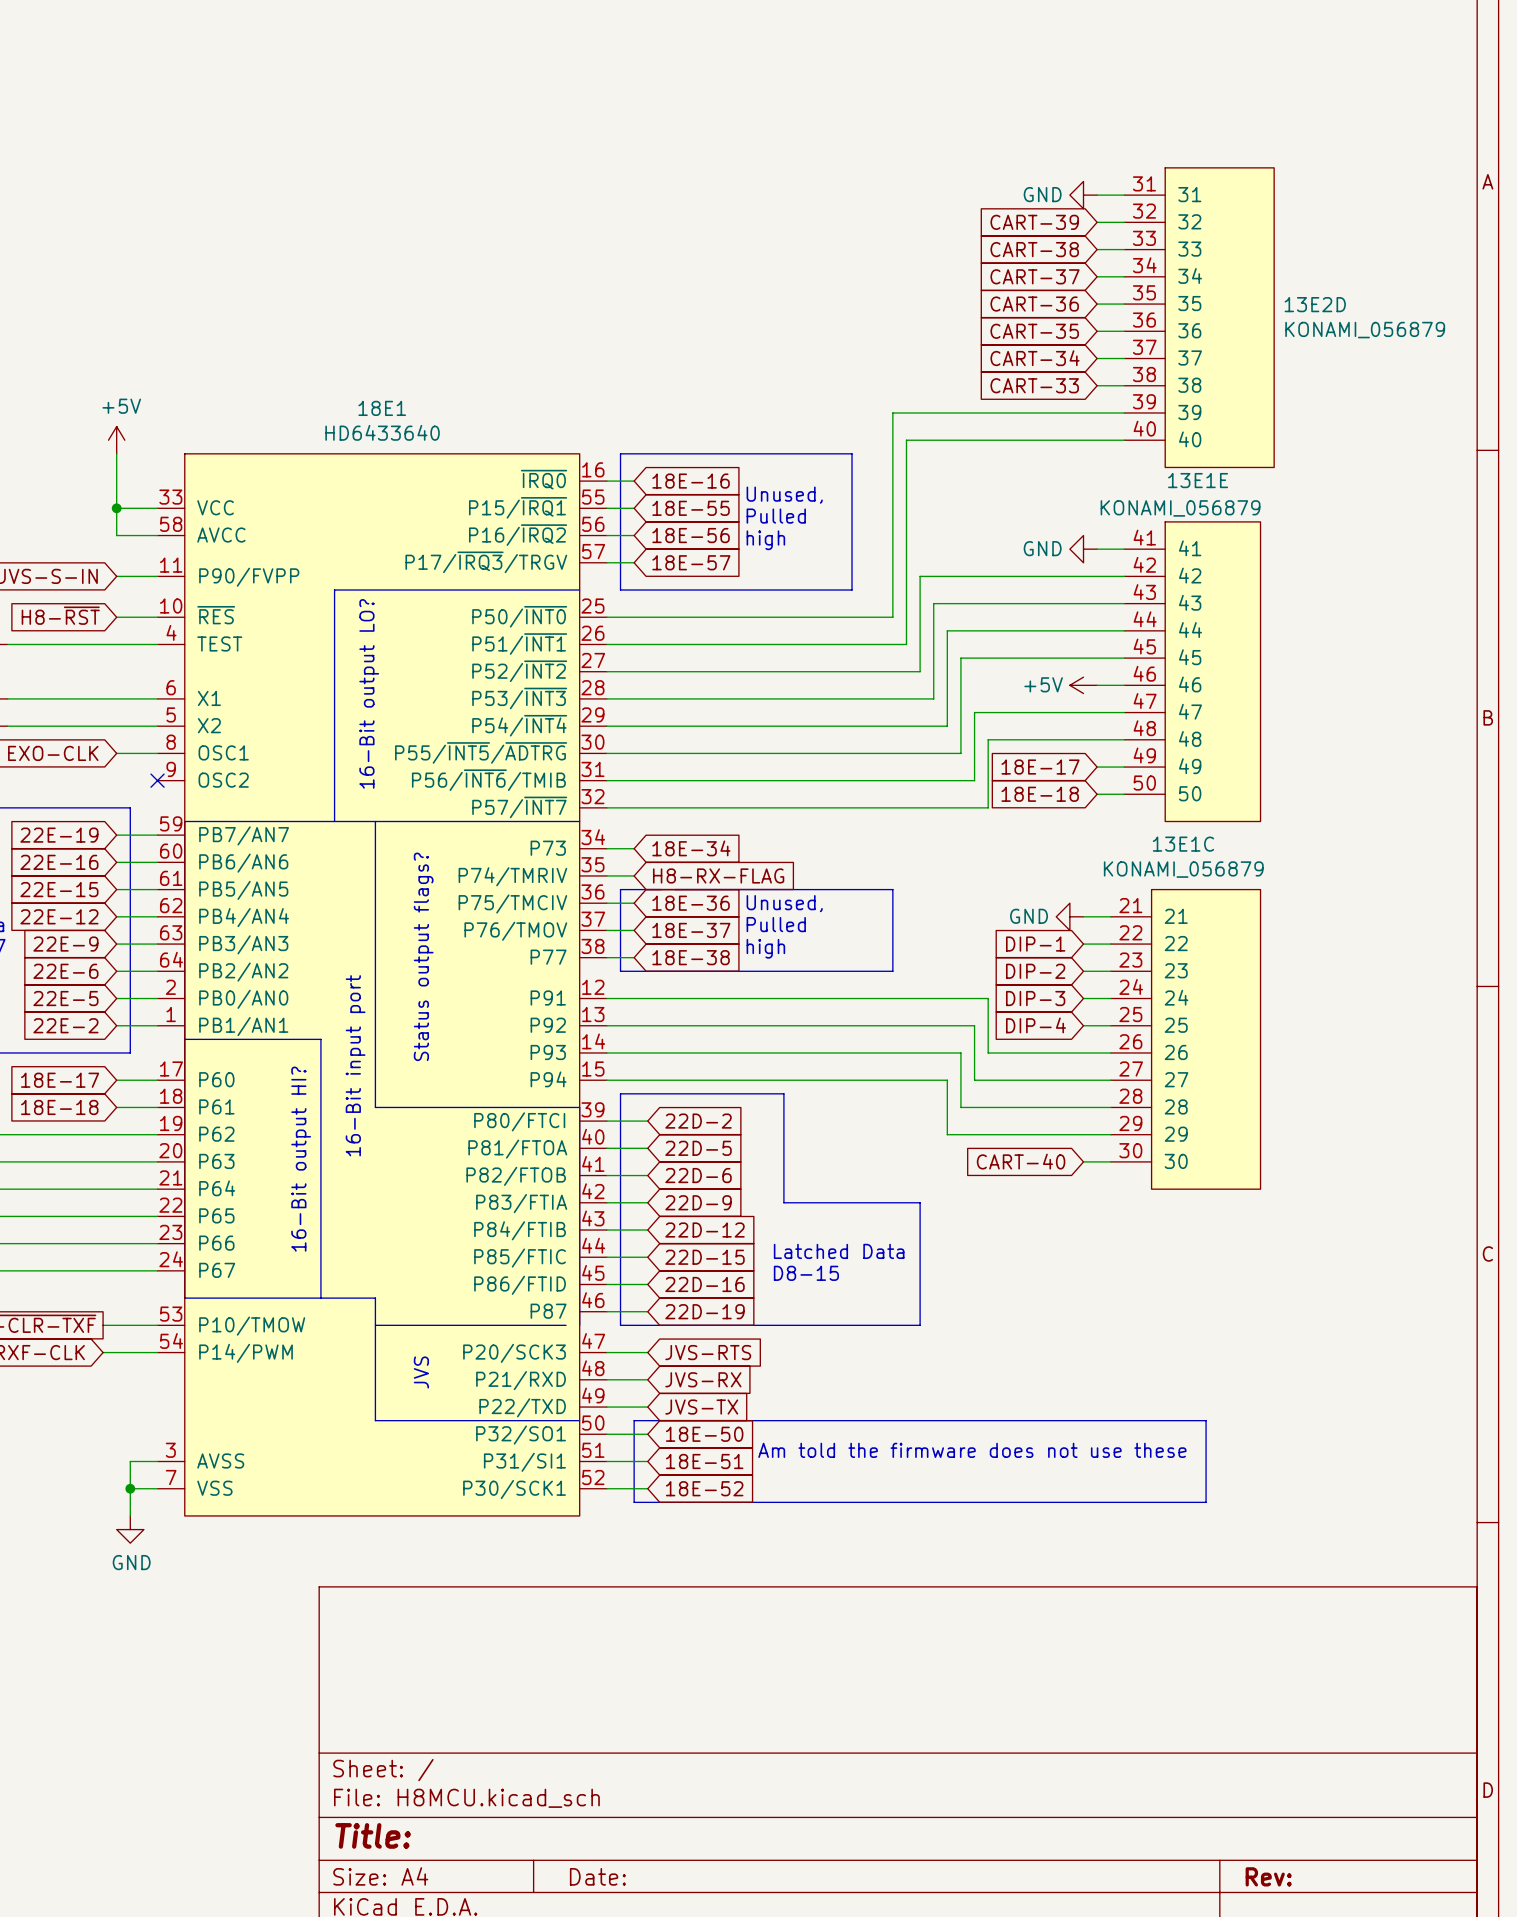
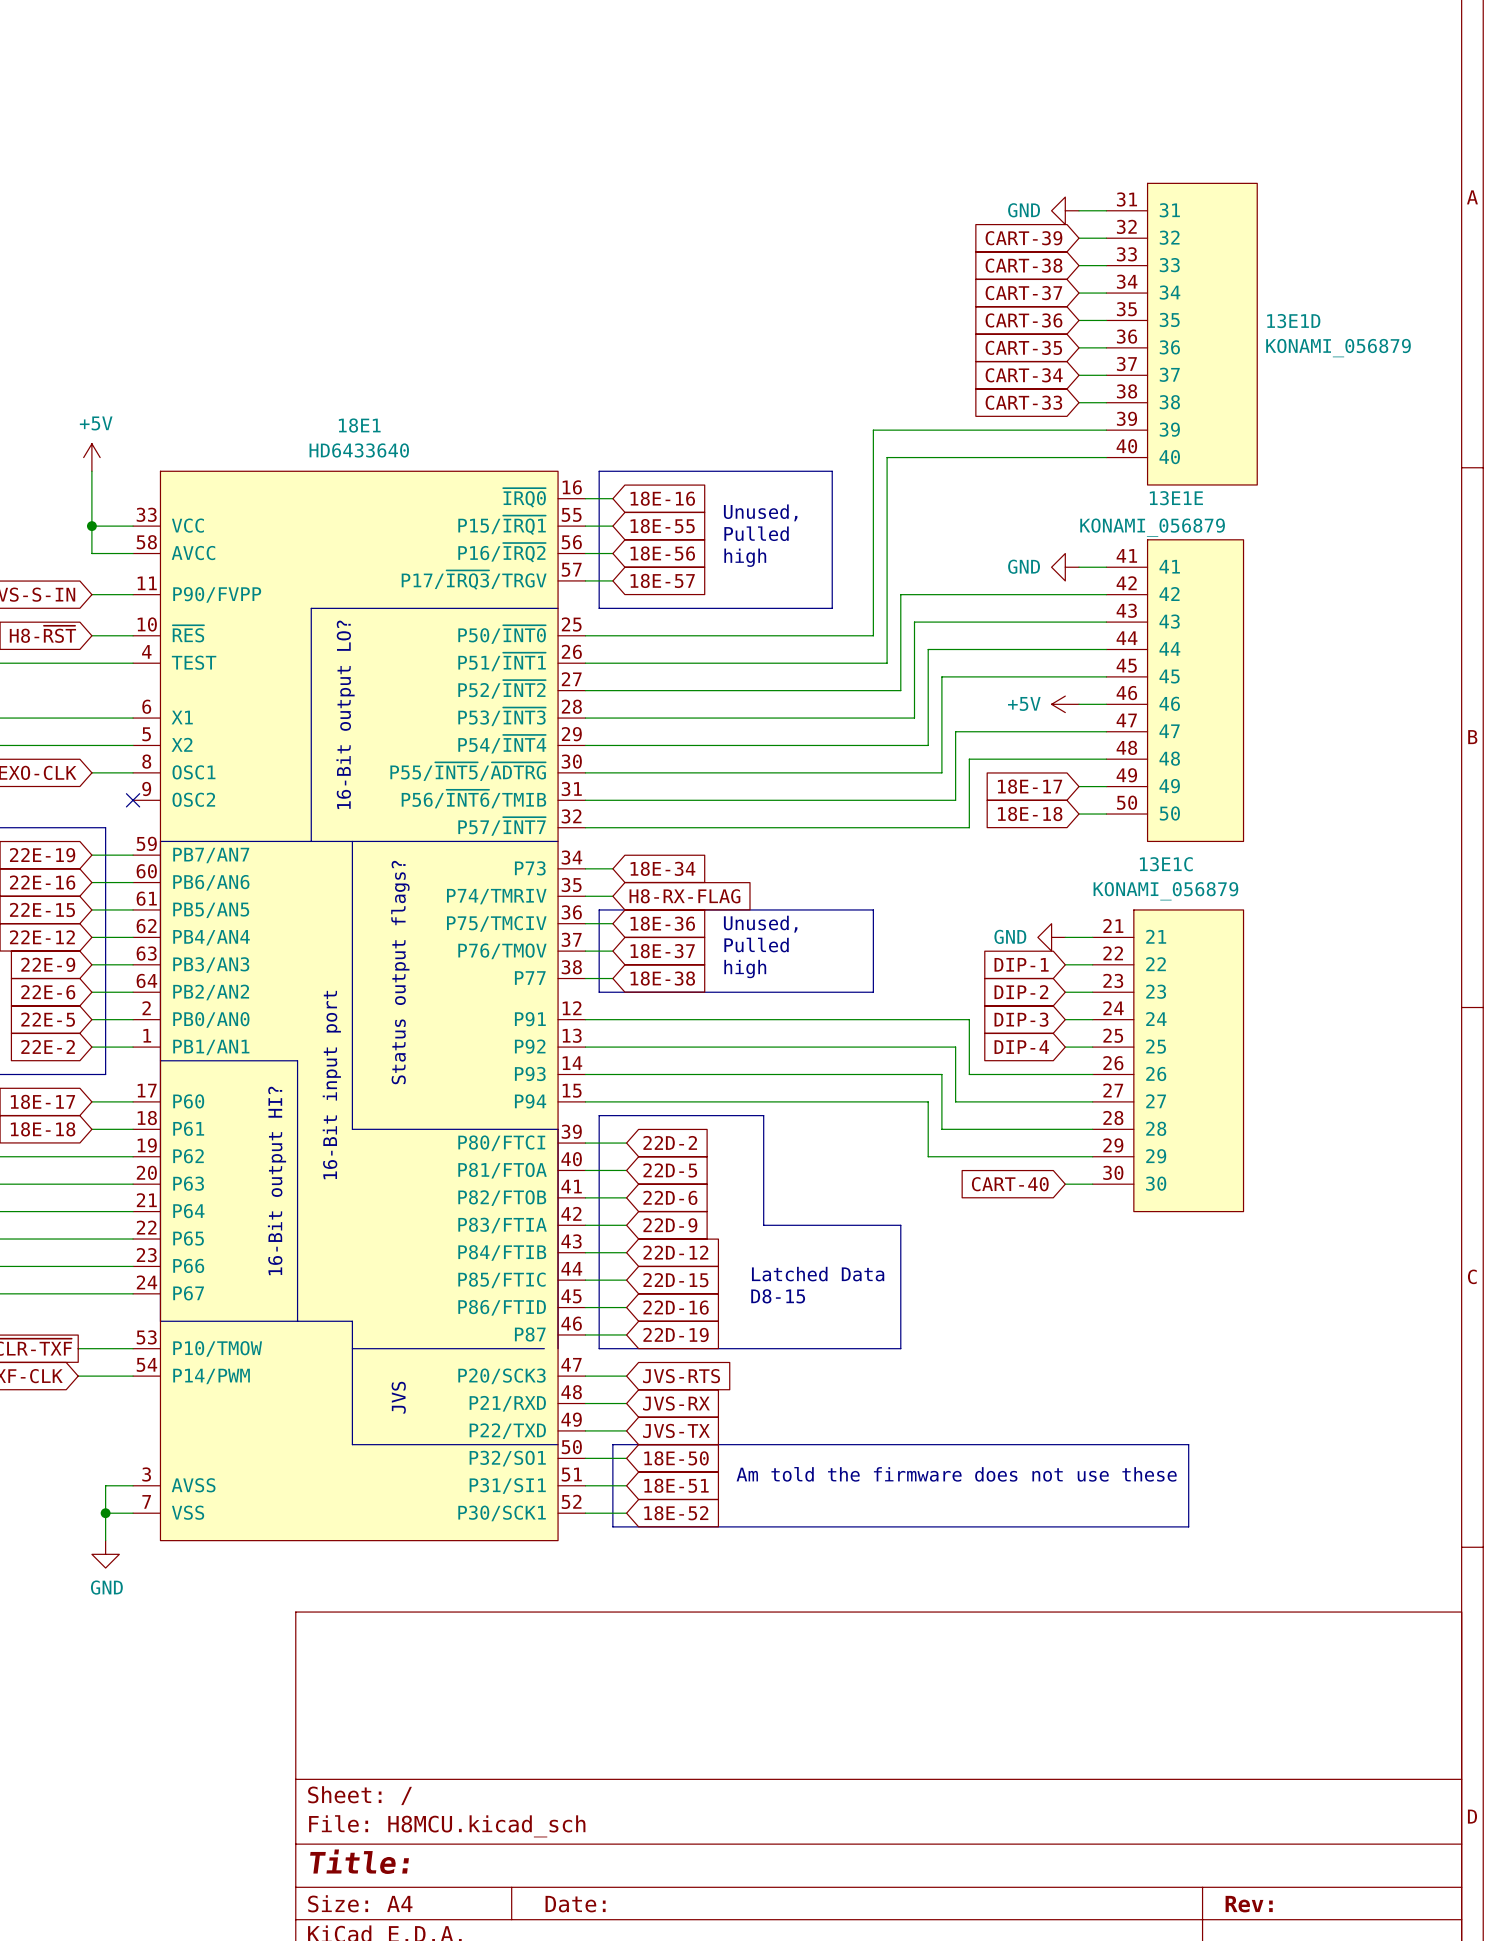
13E2D name: 13E2D (1315, 304) -> 13E1D (1293, 321)

